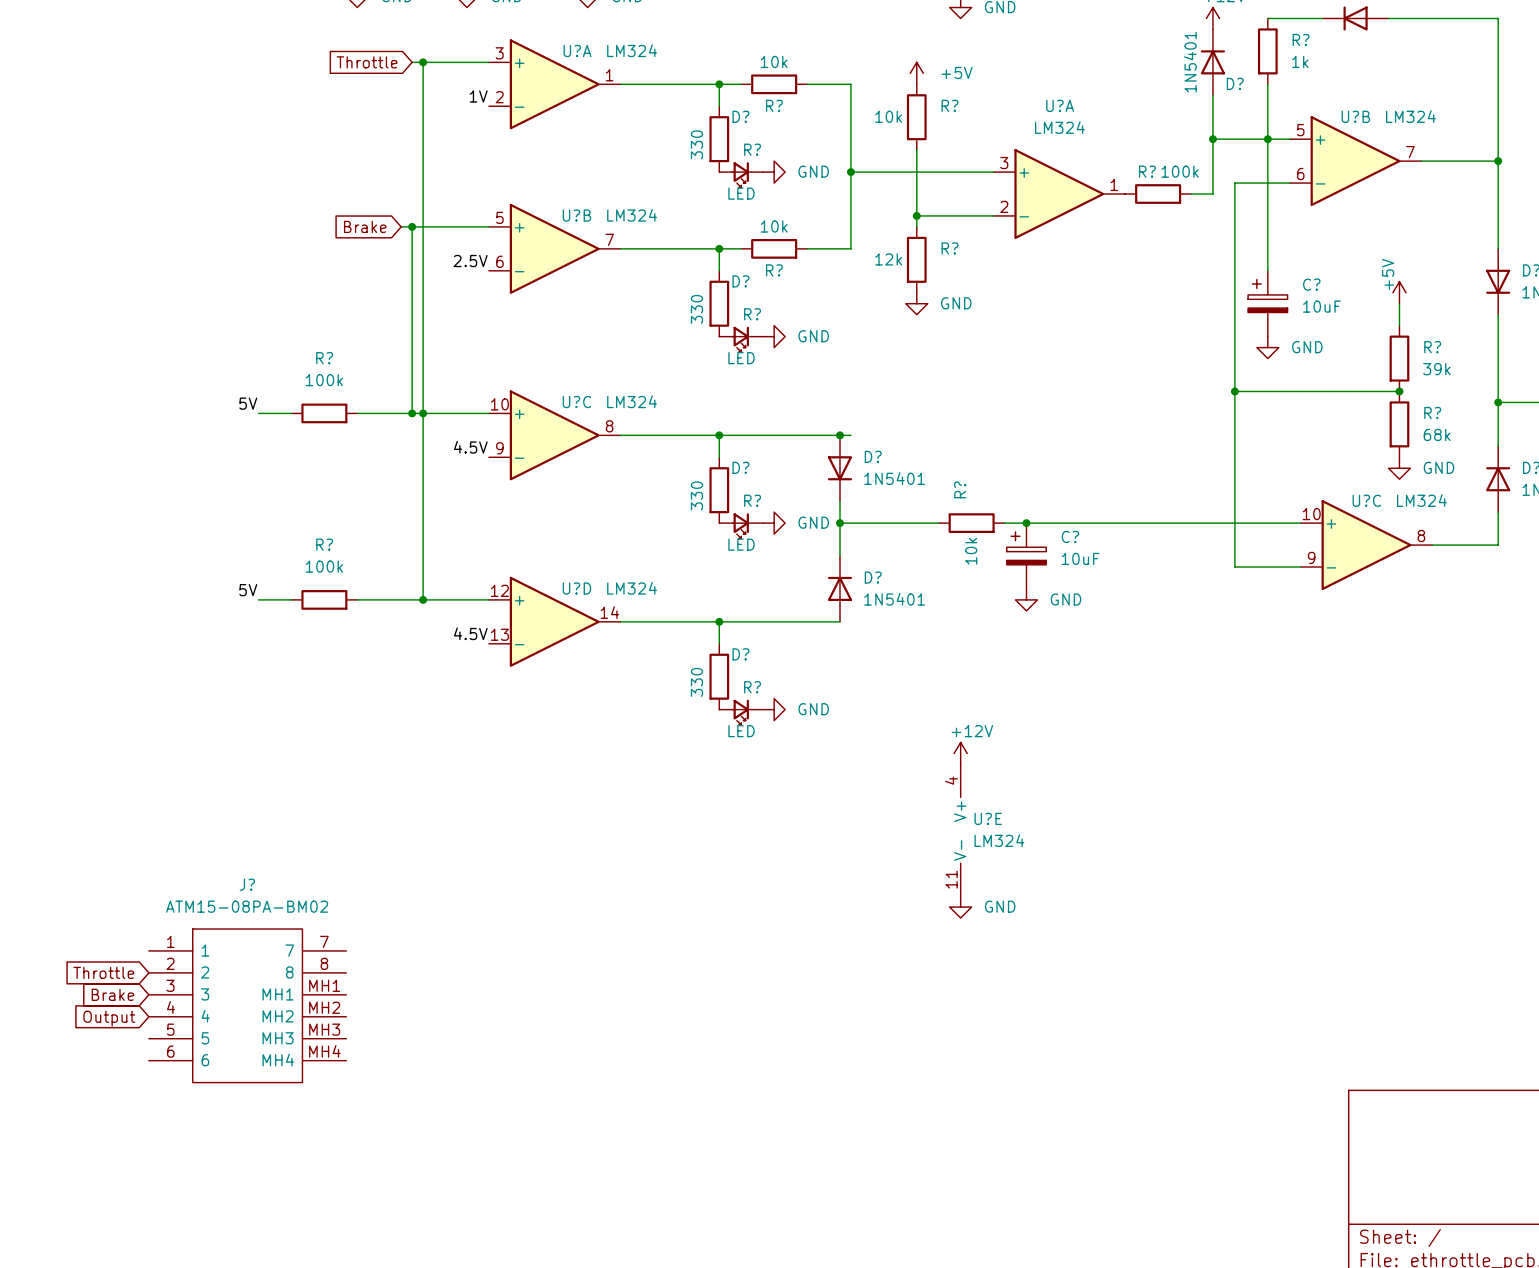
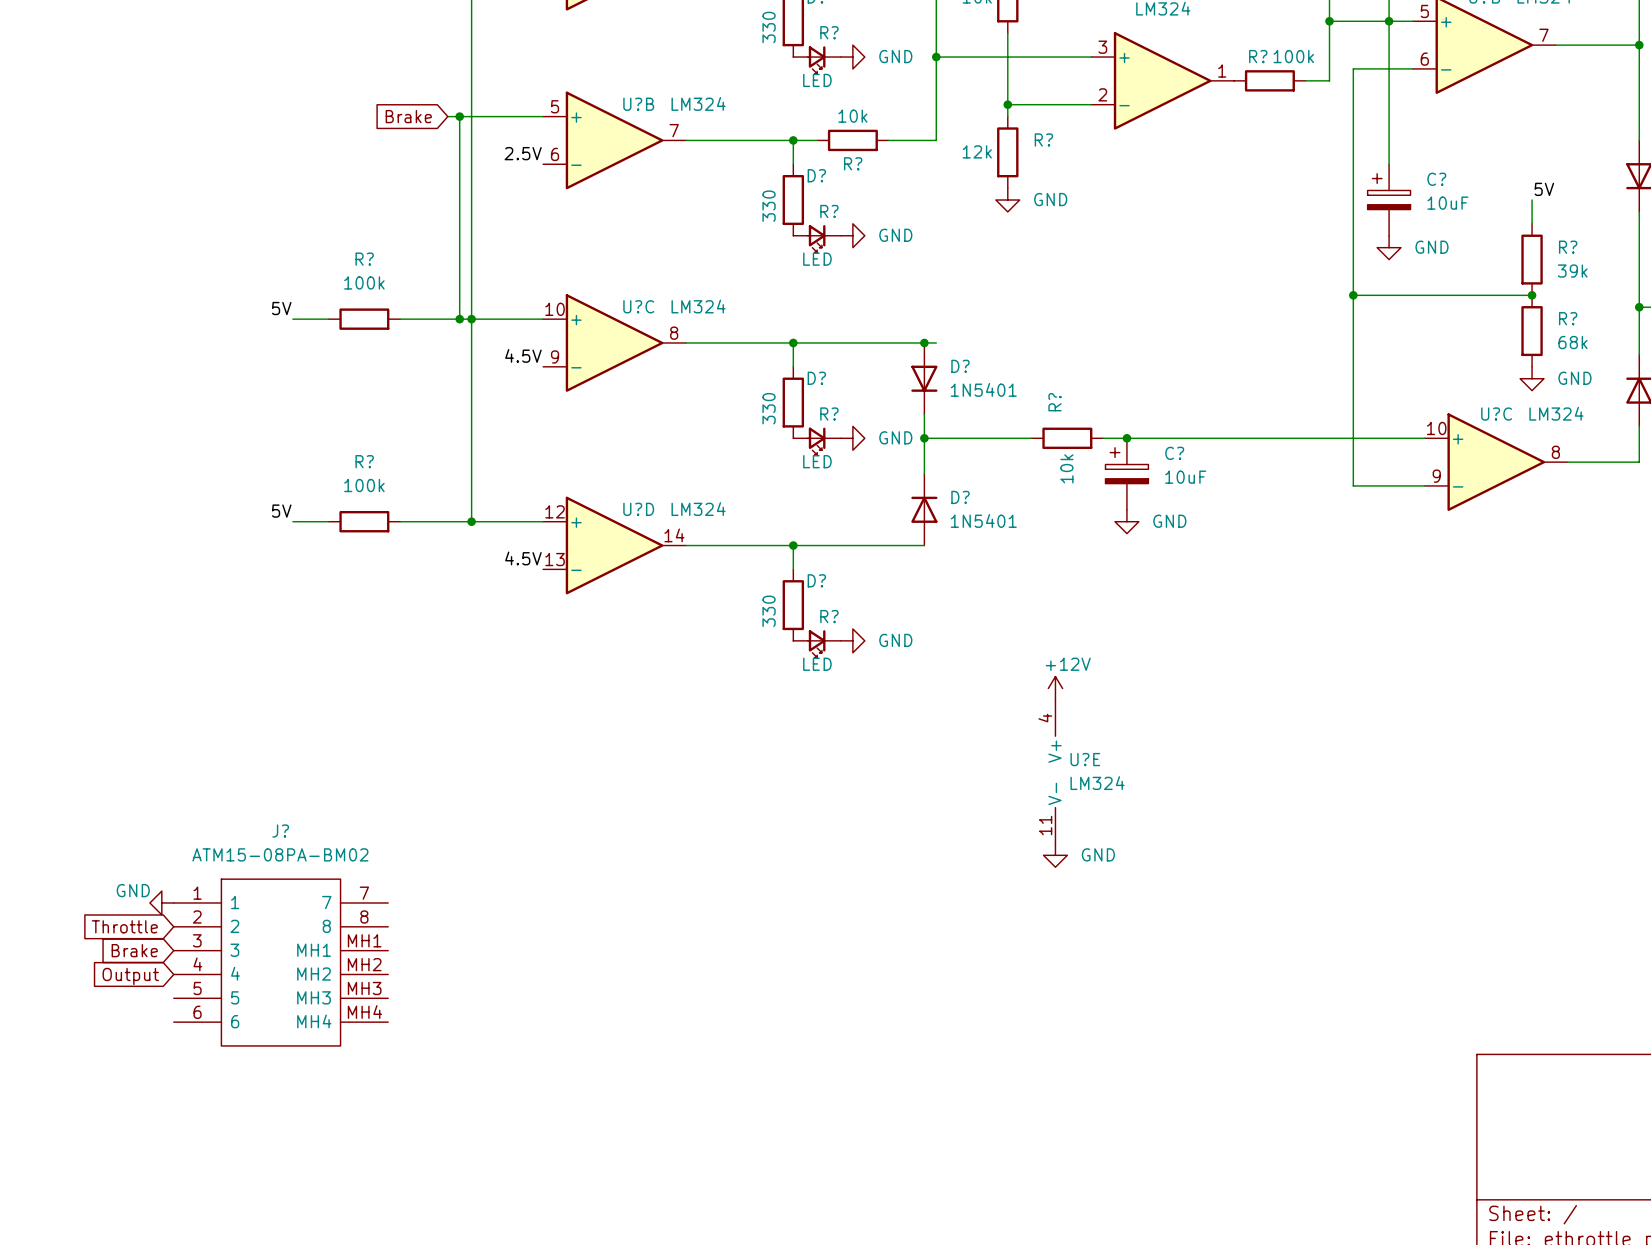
power symbol: +5V (1399, 292) -> none
label: none -> 5V (1544, 189)
power symbol: none -> GND (161, 902)

